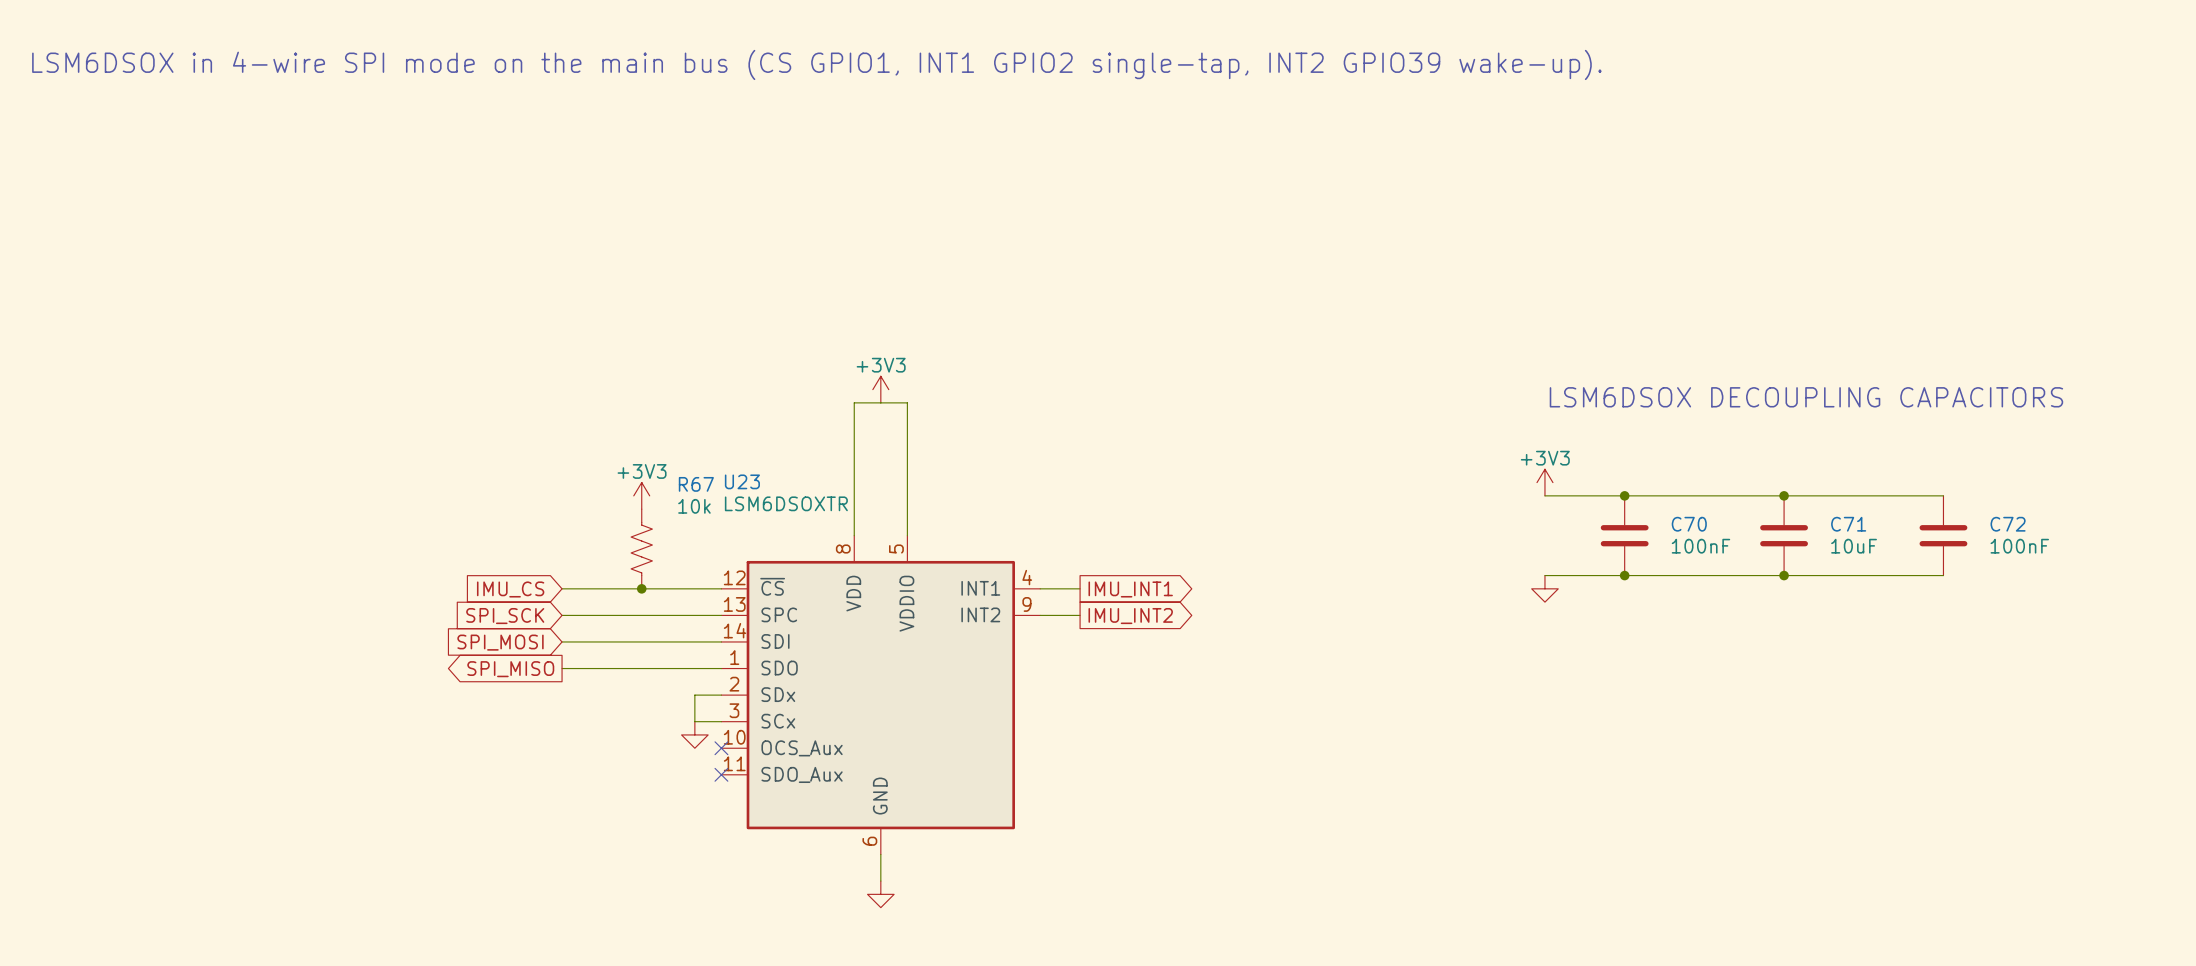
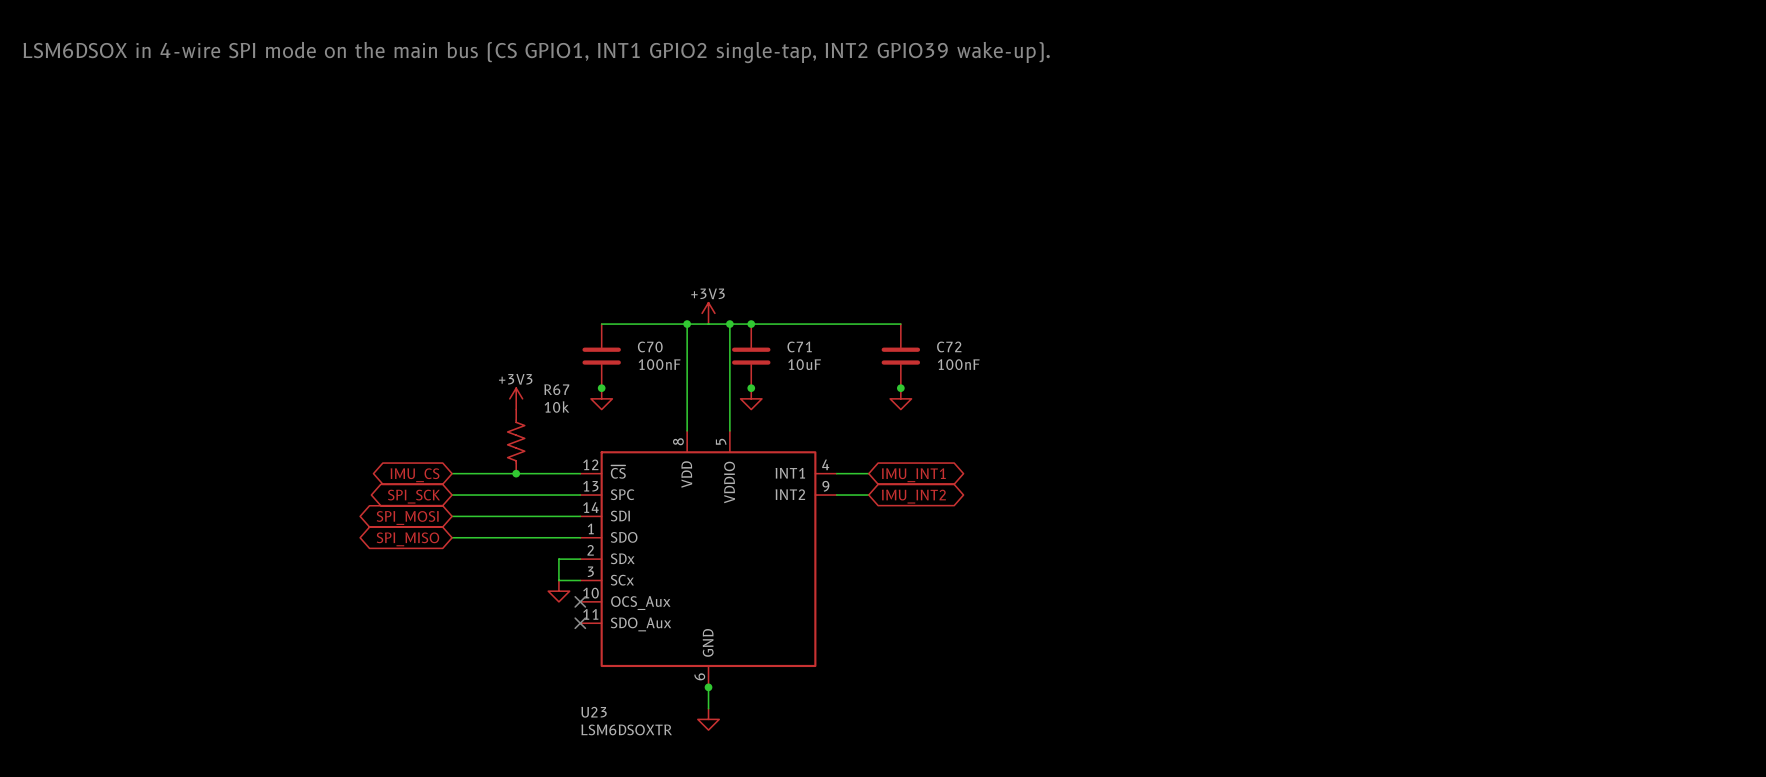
text: LSM6DSOX DECOUPLING CAPACITORS (1806, 397) -> none
wire: none -> (601, 324) (687, 324)
junction: none -> (687, 324)
wire: none -> (729, 324) (900, 324)
junction: none -> (729, 324)
junction: none -> (751, 324)
U23 name position: U23 (742, 481) -> U23 (594, 712)
junction: none -> (601, 388)
junction: none -> (751, 388)
junction: none -> (900, 388)
power symbol: +3V3 (1544, 482) -> none
power symbol: none -> (601, 398)
power symbol: none -> (751, 398)
power symbol: none -> (900, 398)
wire: (1544, 495) (1943, 495) -> none
junction: (1624, 495) -> none
junction: (1784, 495) -> none
U23 value position: LSM6DSOXTR (786, 503) -> LSM6DSOXTR (626, 729)
C70 position: (1624, 535) -> (601, 356)
C71 position: (1784, 535) -> (751, 356)
C72 position: (1943, 535) -> (900, 356)
wire: (1544, 575) (1943, 575) -> none
junction: (1624, 575) -> none
junction: (1784, 575) -> none
power symbol: (1544, 588) -> none
global label shape: input (510, 589) -> bidirectional (415, 475)
global label shape: output (1130, 589) -> bidirectional (913, 475)
global label shape: input (505, 616) -> bidirectional (413, 496)
global label shape: output (1130, 616) -> bidirectional (913, 496)
global label shape: input (500, 642) -> bidirectional (407, 517)
global label shape: output (510, 669) -> bidirectional (407, 539)
junction: none -> (708, 687)

